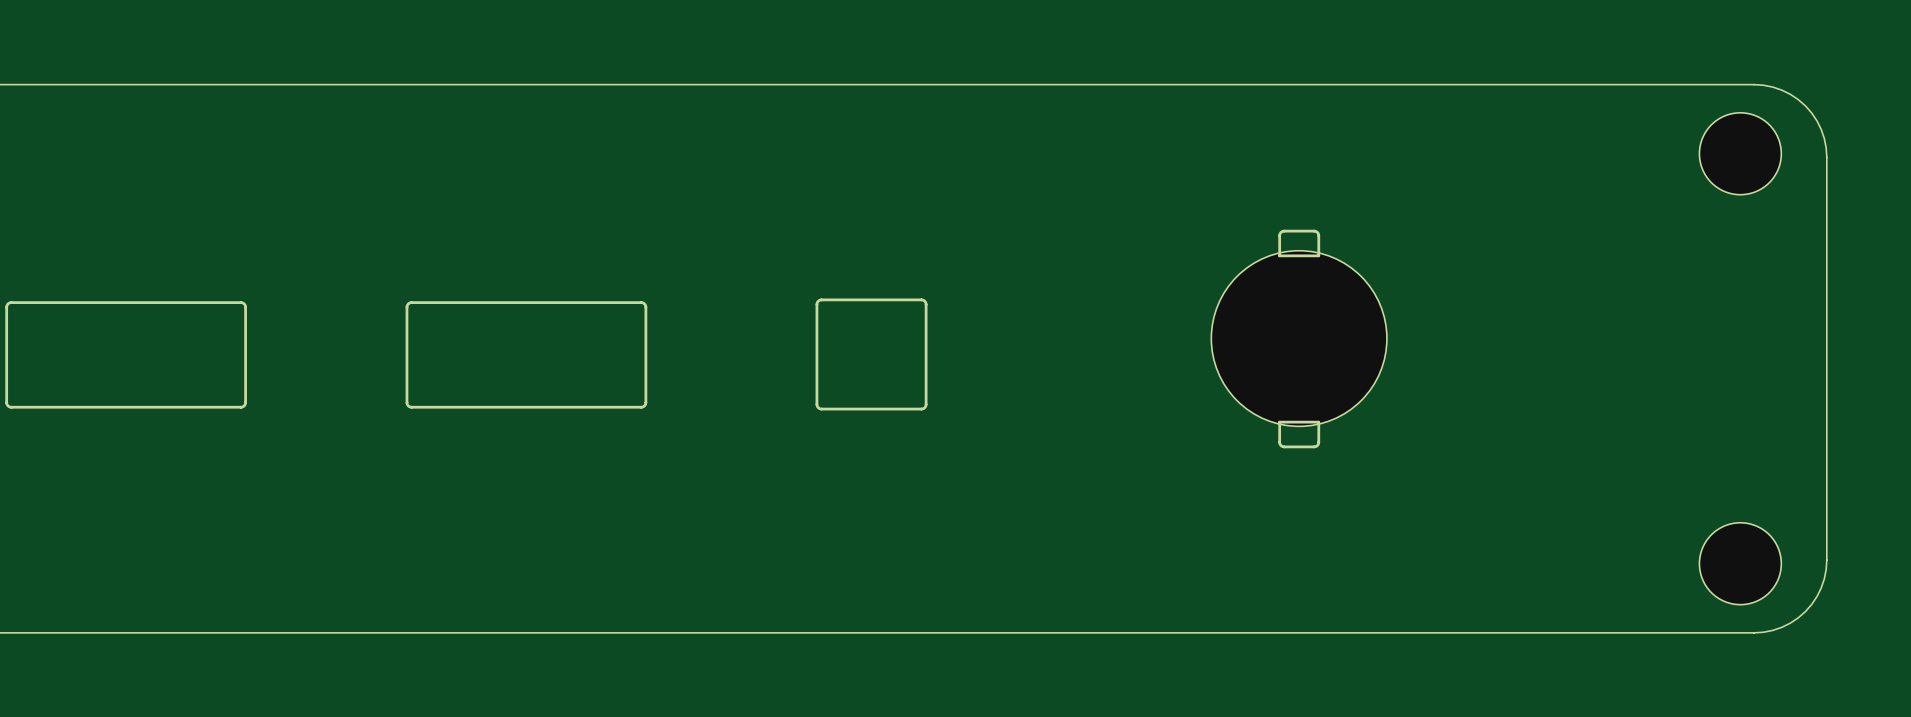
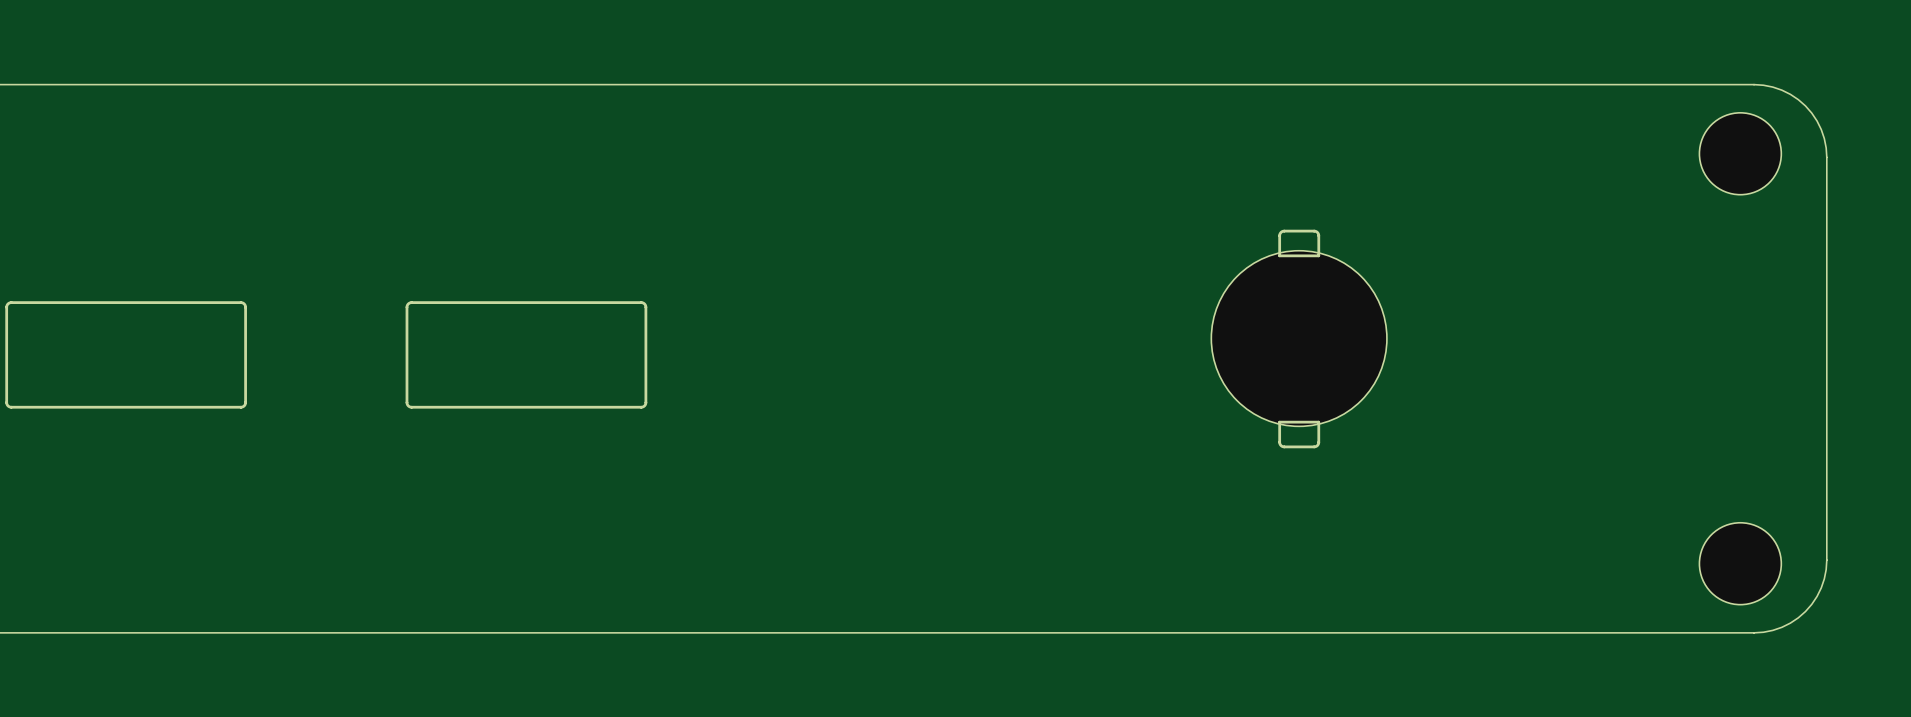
board edge: (921, 299) (818, 301) (818, 407) (924, 407) (926, 304) (921, 299) -> none

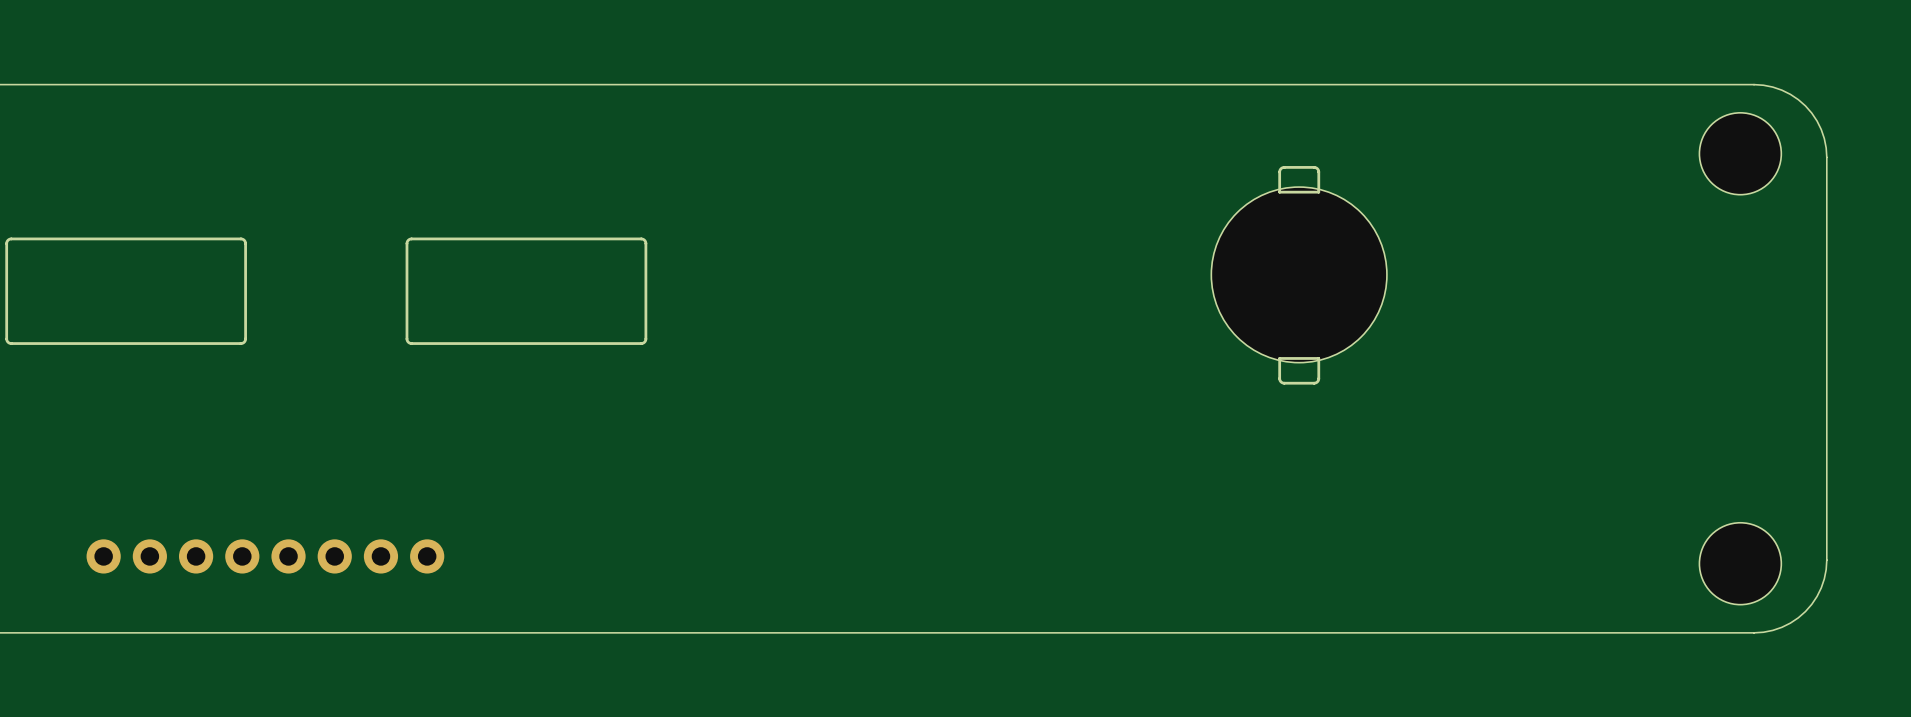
board edge: (1314, 231) (1281, 232) (1279, 235) (1279, 255) (1318, 255) (1318, 235) (1314, 231) -> (1314, 167) (1281, 168) (1279, 171) (1279, 192) (1318, 192) (1318, 171) (1314, 167)
board edge: (245, 307) (240, 302) (11, 302) (6, 307) -> (245, 307) (245, 242) (240, 238) (10, 239) (6, 243) (6, 307)
board edge: (645, 307) (641, 302) (411, 302) (406, 307) -> (645, 307) (645, 242) (641, 238) (410, 239) (406, 243) (406, 307)
board edge: (245, 338) (245, 403) (240, 407) (10, 407) (6, 402) (6, 338) -> (245, 338) (240, 343) (11, 343) (6, 338)
board edge: (645, 338) (645, 403) (641, 407) (410, 407) (406, 402) (406, 338) -> (645, 338) (641, 343) (411, 343) (406, 338)
hole position: (1299, 338) -> (1299, 274)
board edge: (1318, 422) (1279, 422) (1280, 444) (1284, 446) (1316, 446) (1318, 442) (1318, 422) -> (1318, 358) (1279, 358) (1280, 380) (1284, 383) (1316, 382) (1318, 379) (1318, 358)
part: none -> (265, 556)

